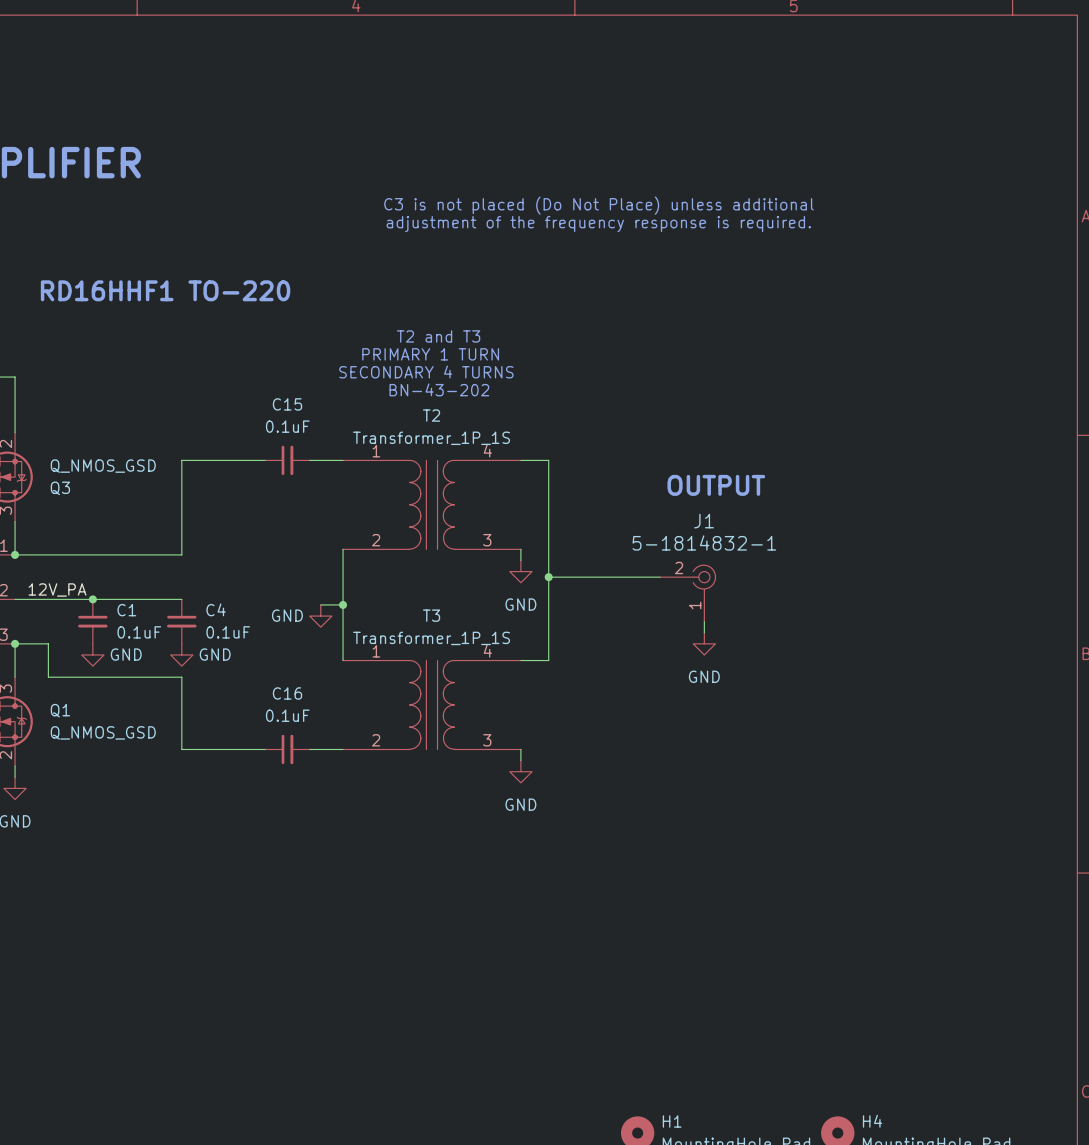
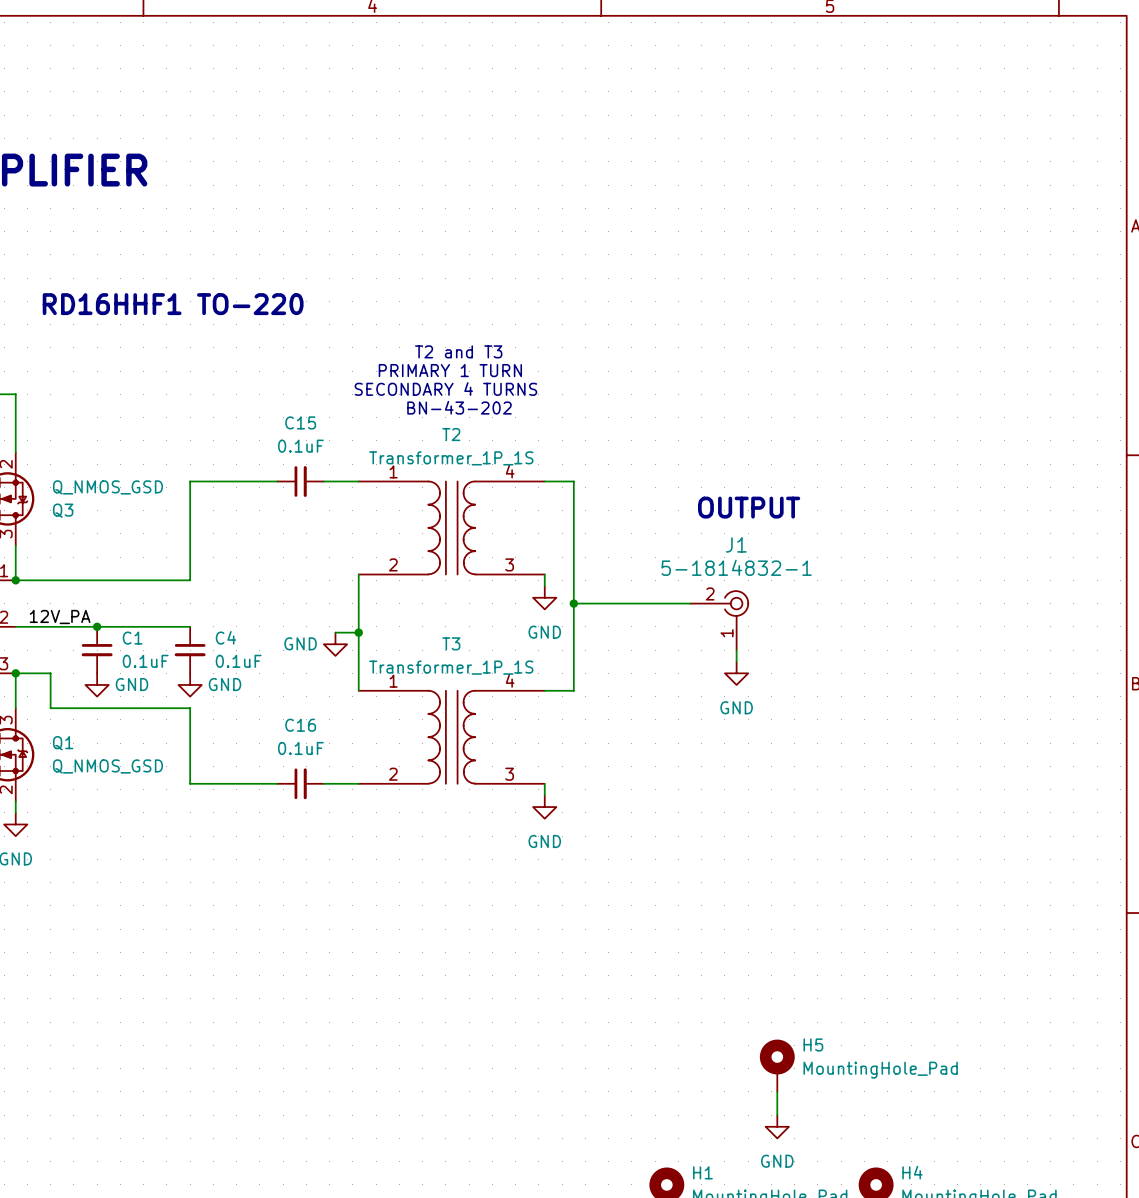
text: C3 is not placed (Do Not Place) unless additional (599, 205) -> none
text: adjustment of the frequency response is required. (598, 224) -> none
H5: none -> MountingHole_Pad (777, 1065)
wire: none -> (777, 1091) (777, 1115)
power symbol: none -> GND (777, 1126)

